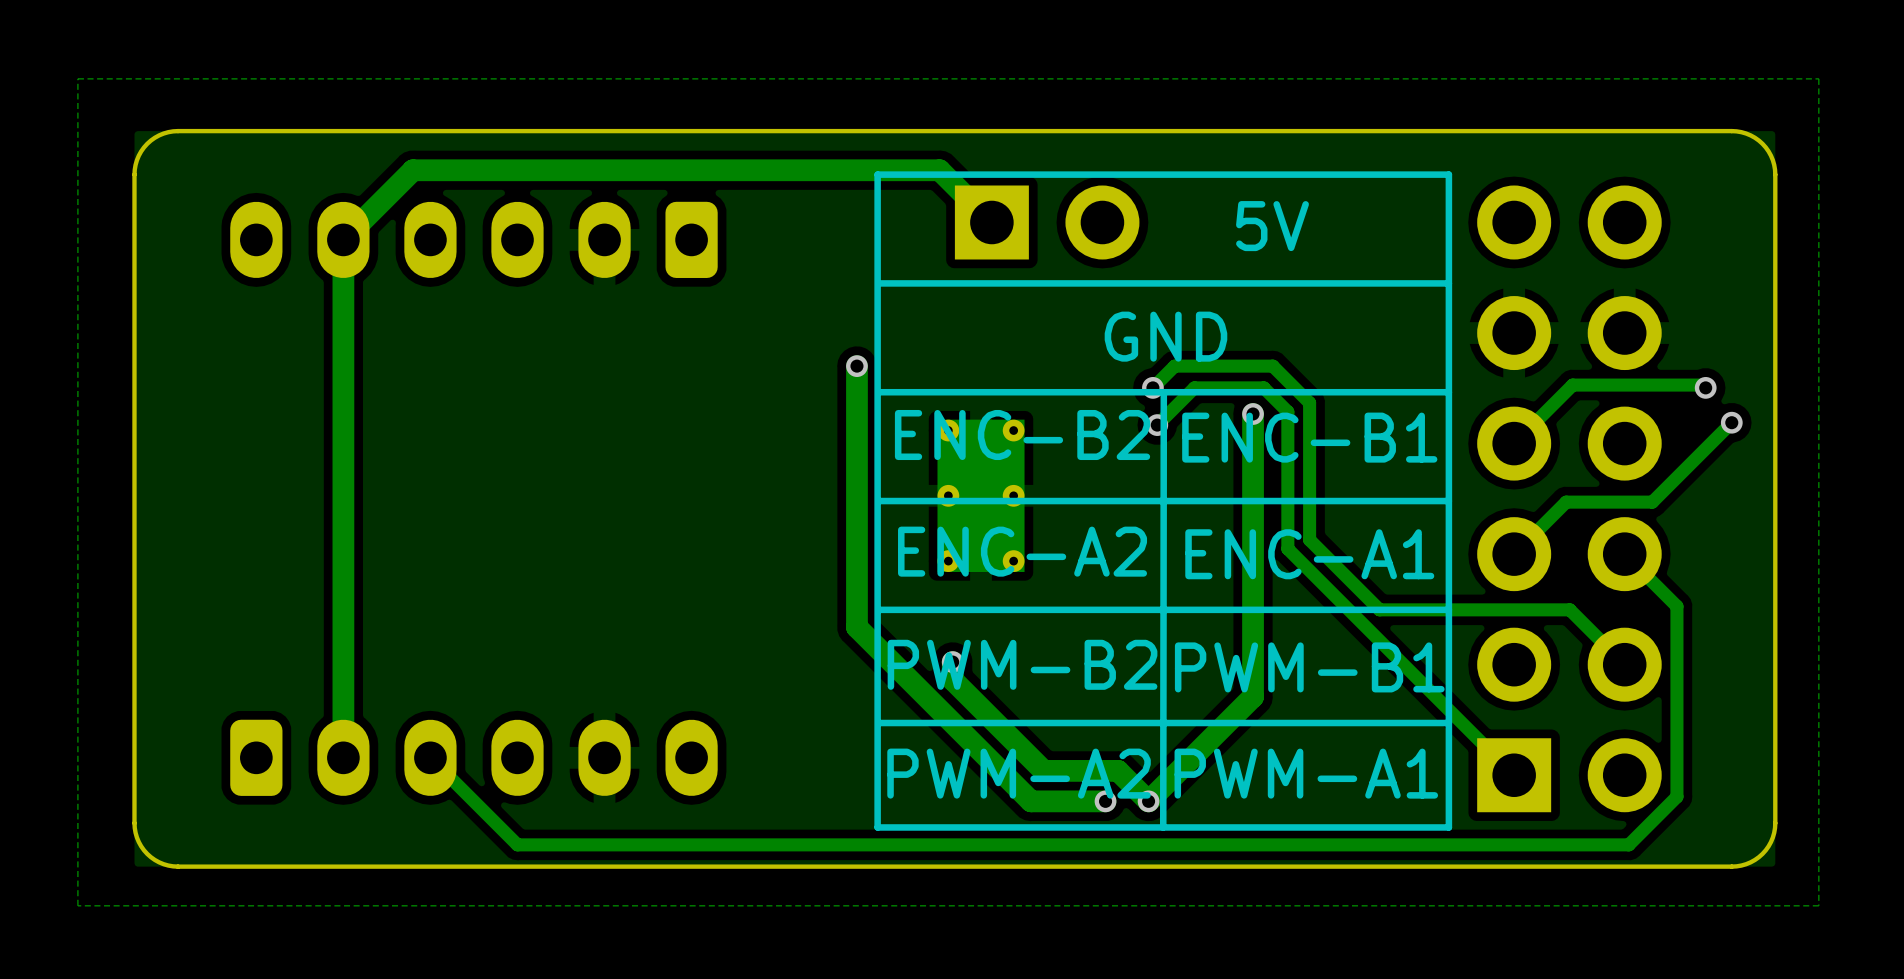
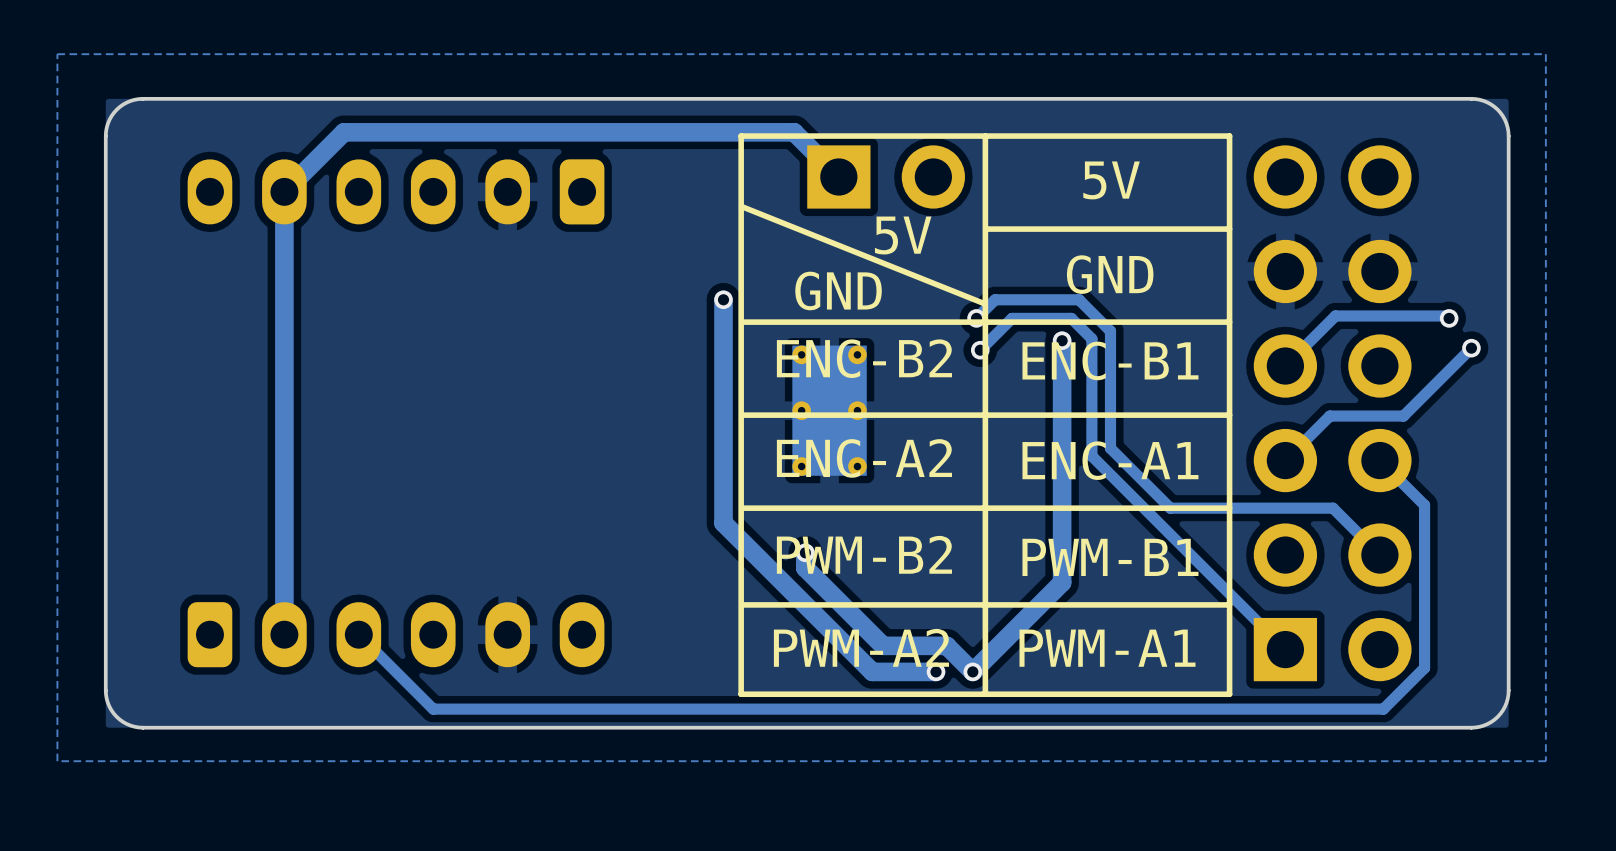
text position: 5V (1272, 226) -> 5V (1111, 180)
line: none -> (742, 206) (983, 303)
line: (1165, 283) (878, 283) -> none
text: none -> 5V (903, 235)
text position: GND (1165, 336) -> GND (1110, 274)
text: none -> GND (838, 290)
line: (1163, 392) (1163, 827) -> (985, 136) (985, 694)

